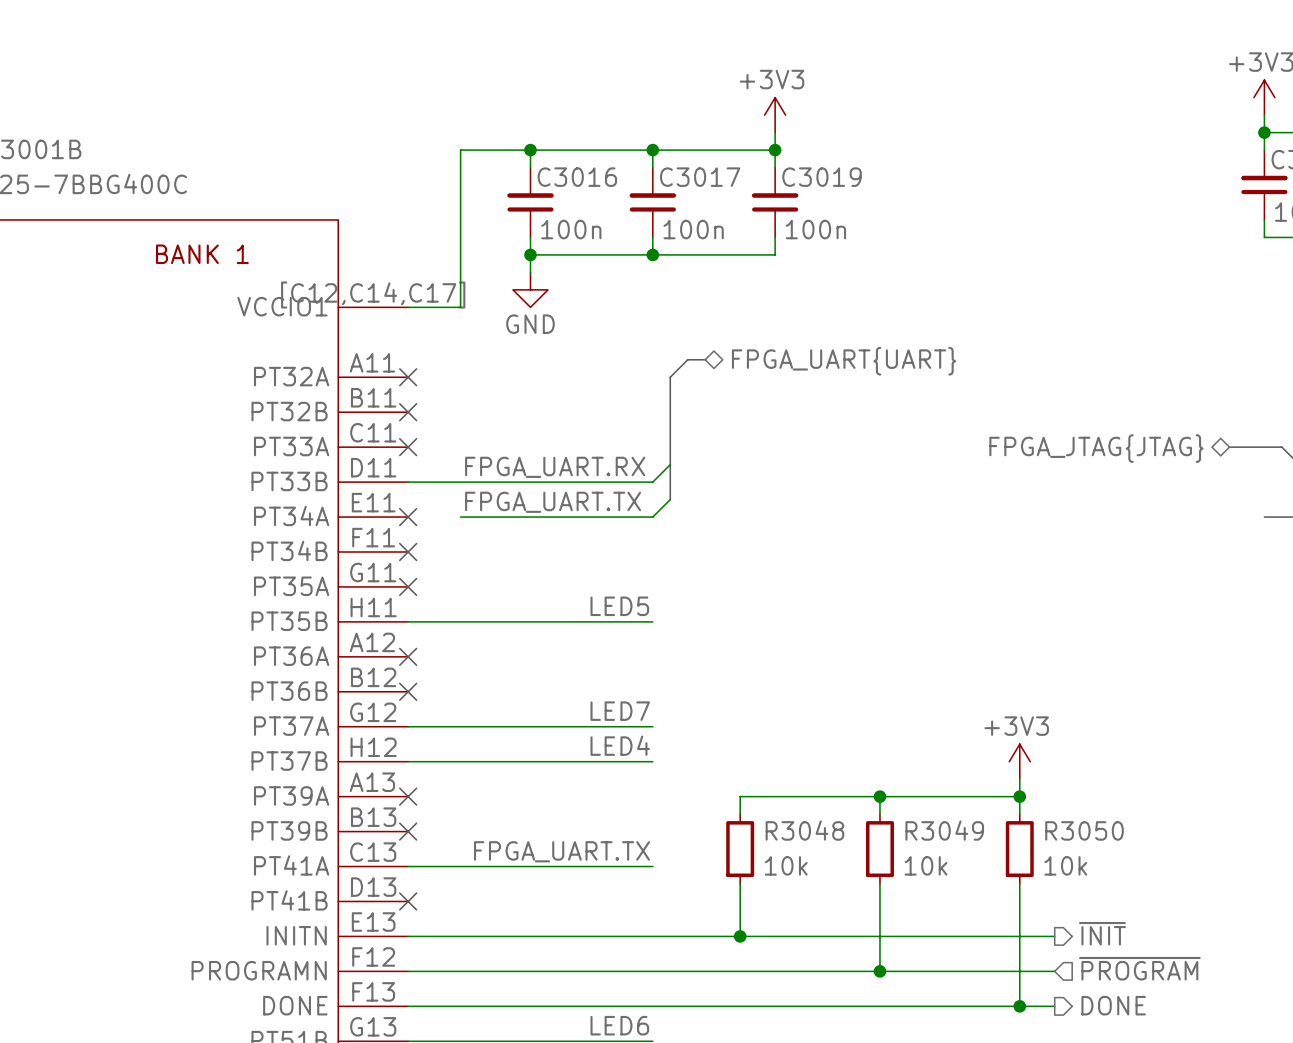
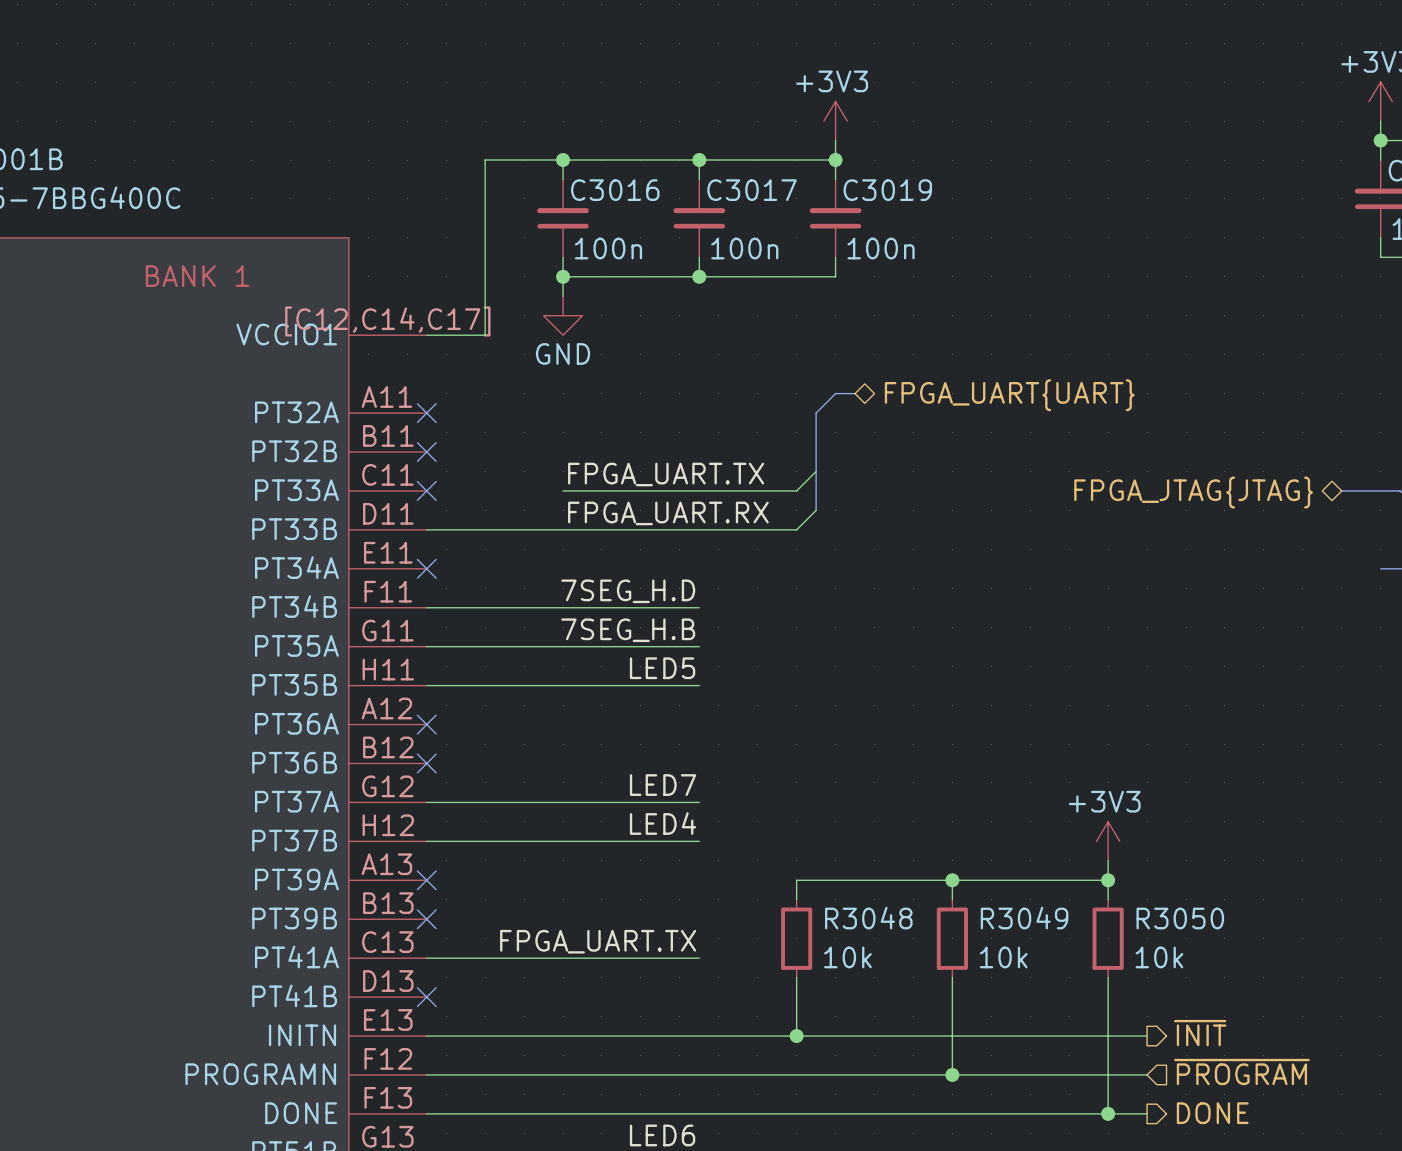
bus: (705, 359) (687, 359) (670, 377) (670, 499) -> none
bus: none -> (855, 393) (835, 393) (816, 413) (816, 510)
hierarchical label position: FPGA_UART{UART} (844, 361) -> FPGA_UART{UART} (1009, 395)
wire: none -> (816, 471) (796, 490) (563, 490)
wire: (670, 464) (652, 482) -> (816, 510) (796, 529) (699, 529)
label position: FPGA_UART.RX (555, 467) -> FPGA_UART.RX (668, 513)
wire: (670, 499) (652, 517) (460, 517) -> none
label position: FPGA_UART.TX (553, 502) -> FPGA_UART.TX (666, 474)
label: none -> 7SEG_H.D (628, 591)
wire: none -> (426, 607) (699, 607)
no-connect mark: (408, 551) -> none
label: none -> 7SEG_H.B (628, 630)
wire: none -> (426, 646) (699, 646)
no-connect mark: (408, 586) -> none

